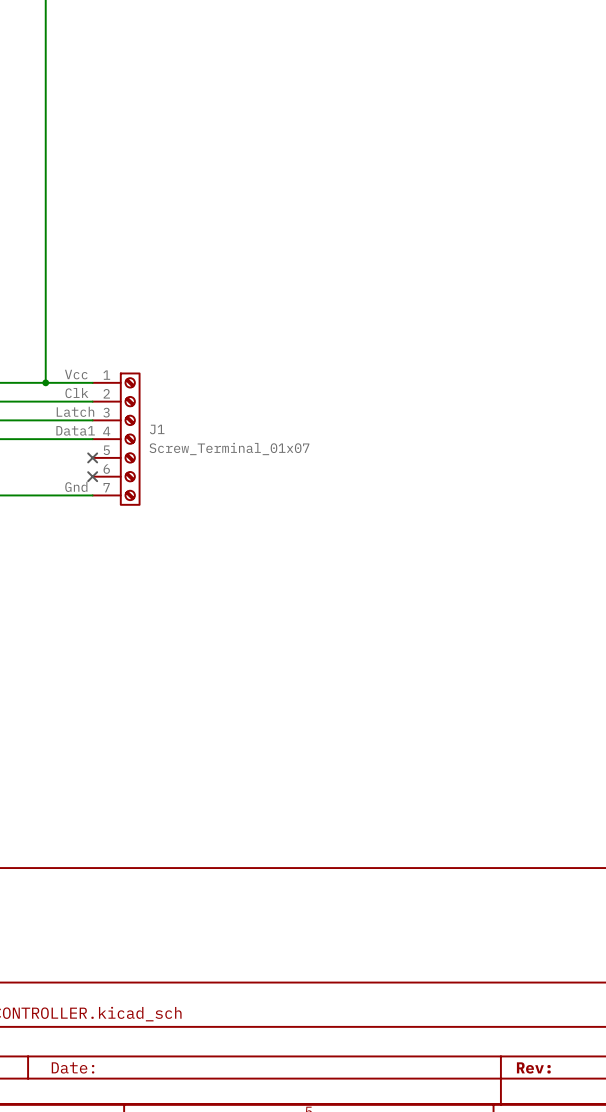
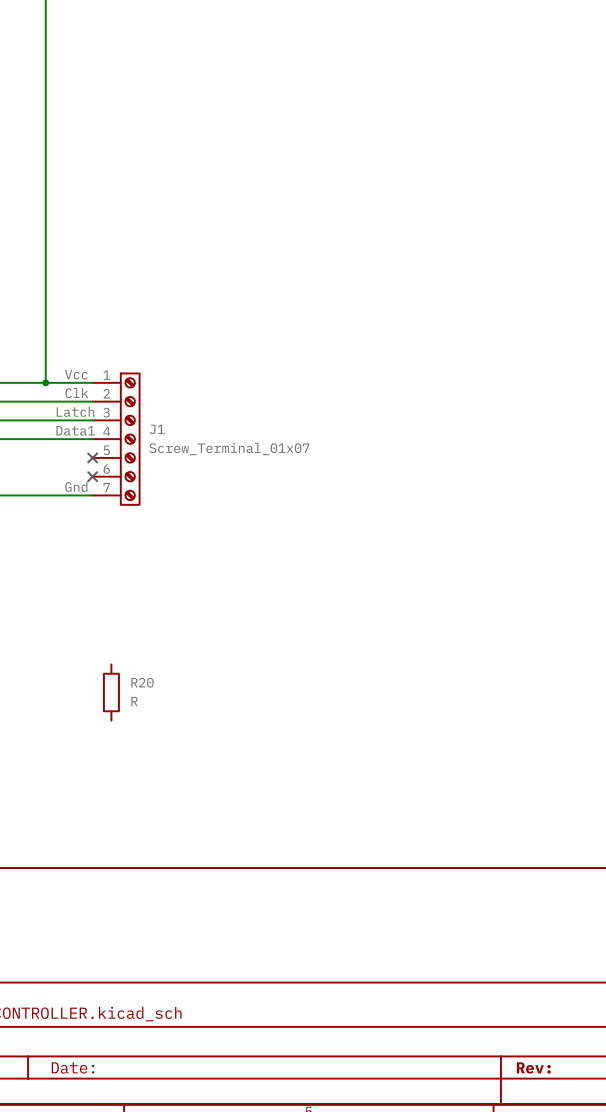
R20: none -> R (111, 692)

